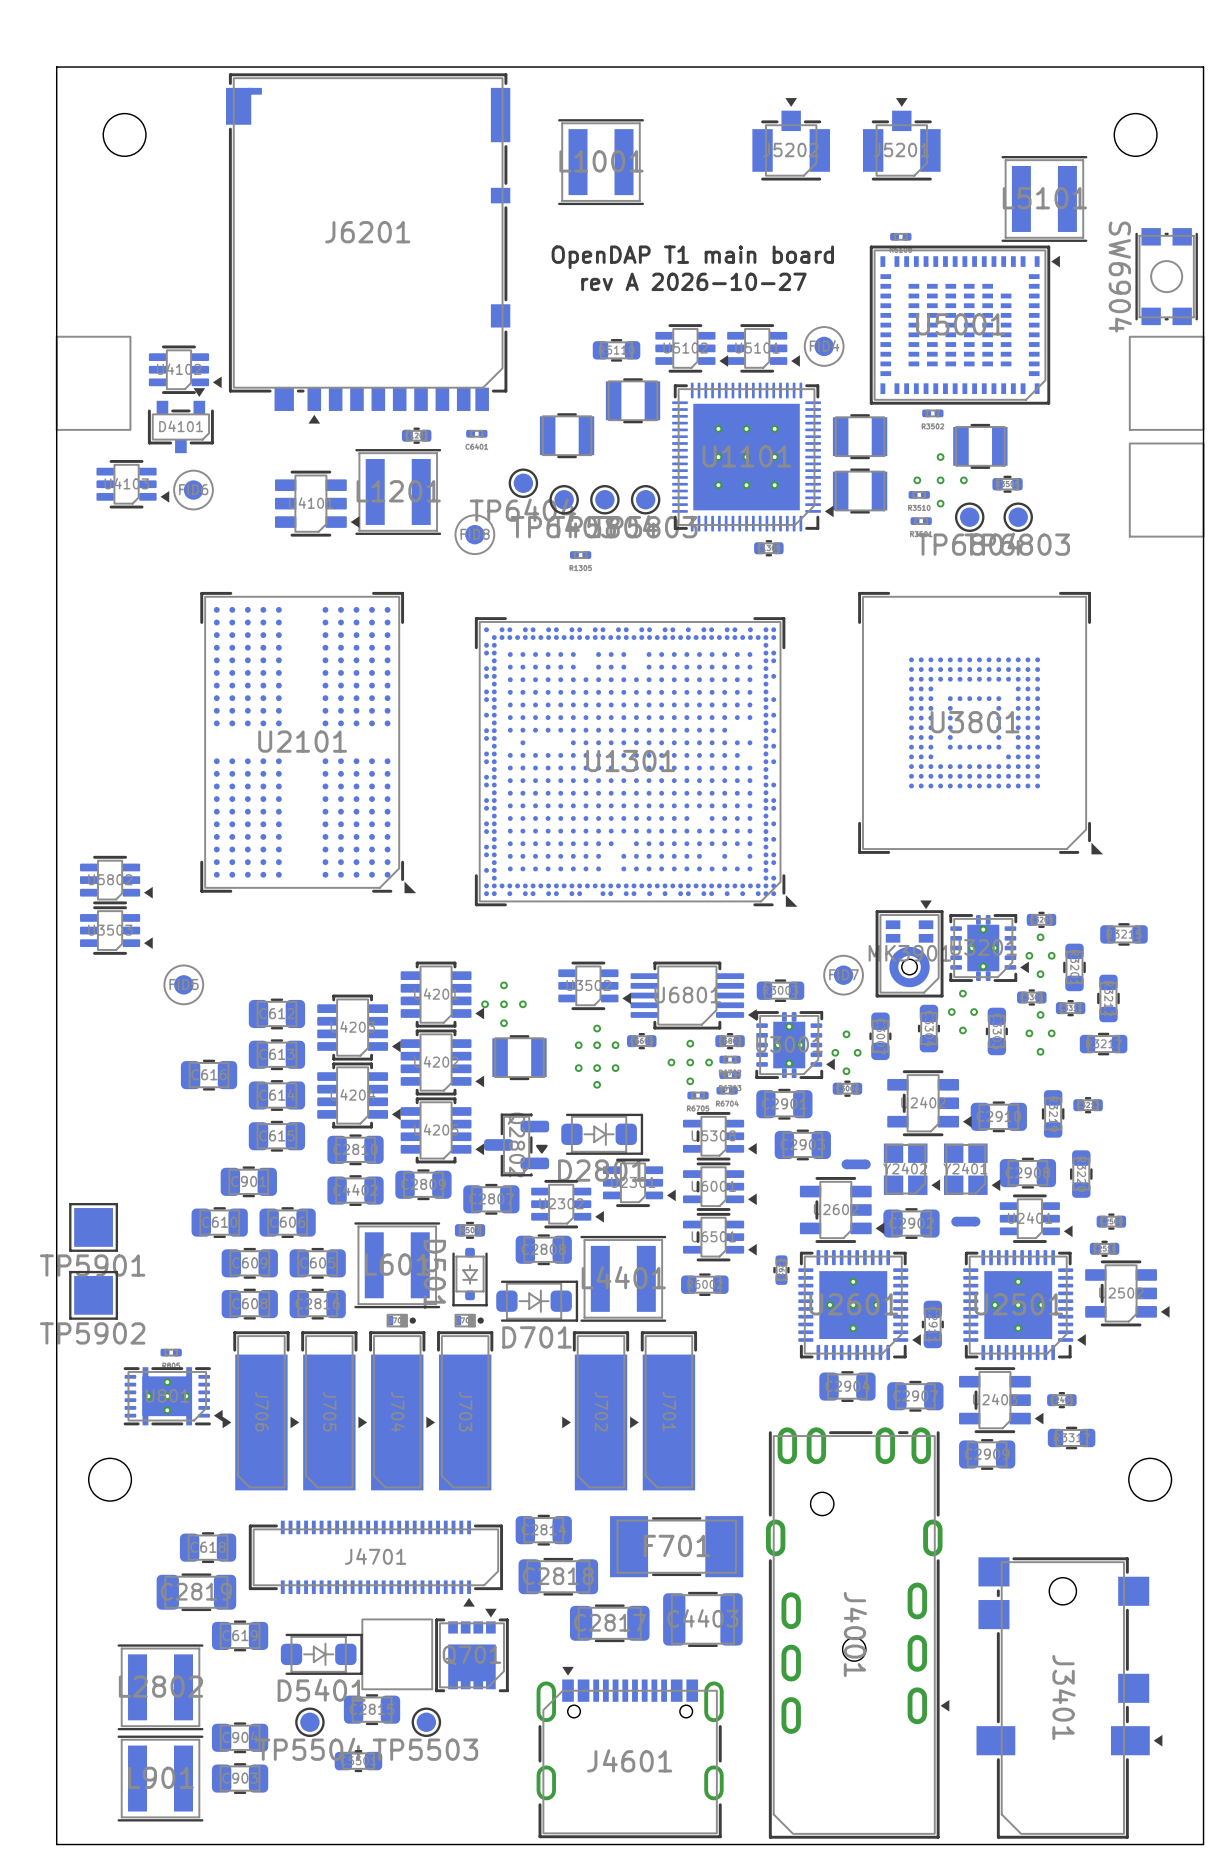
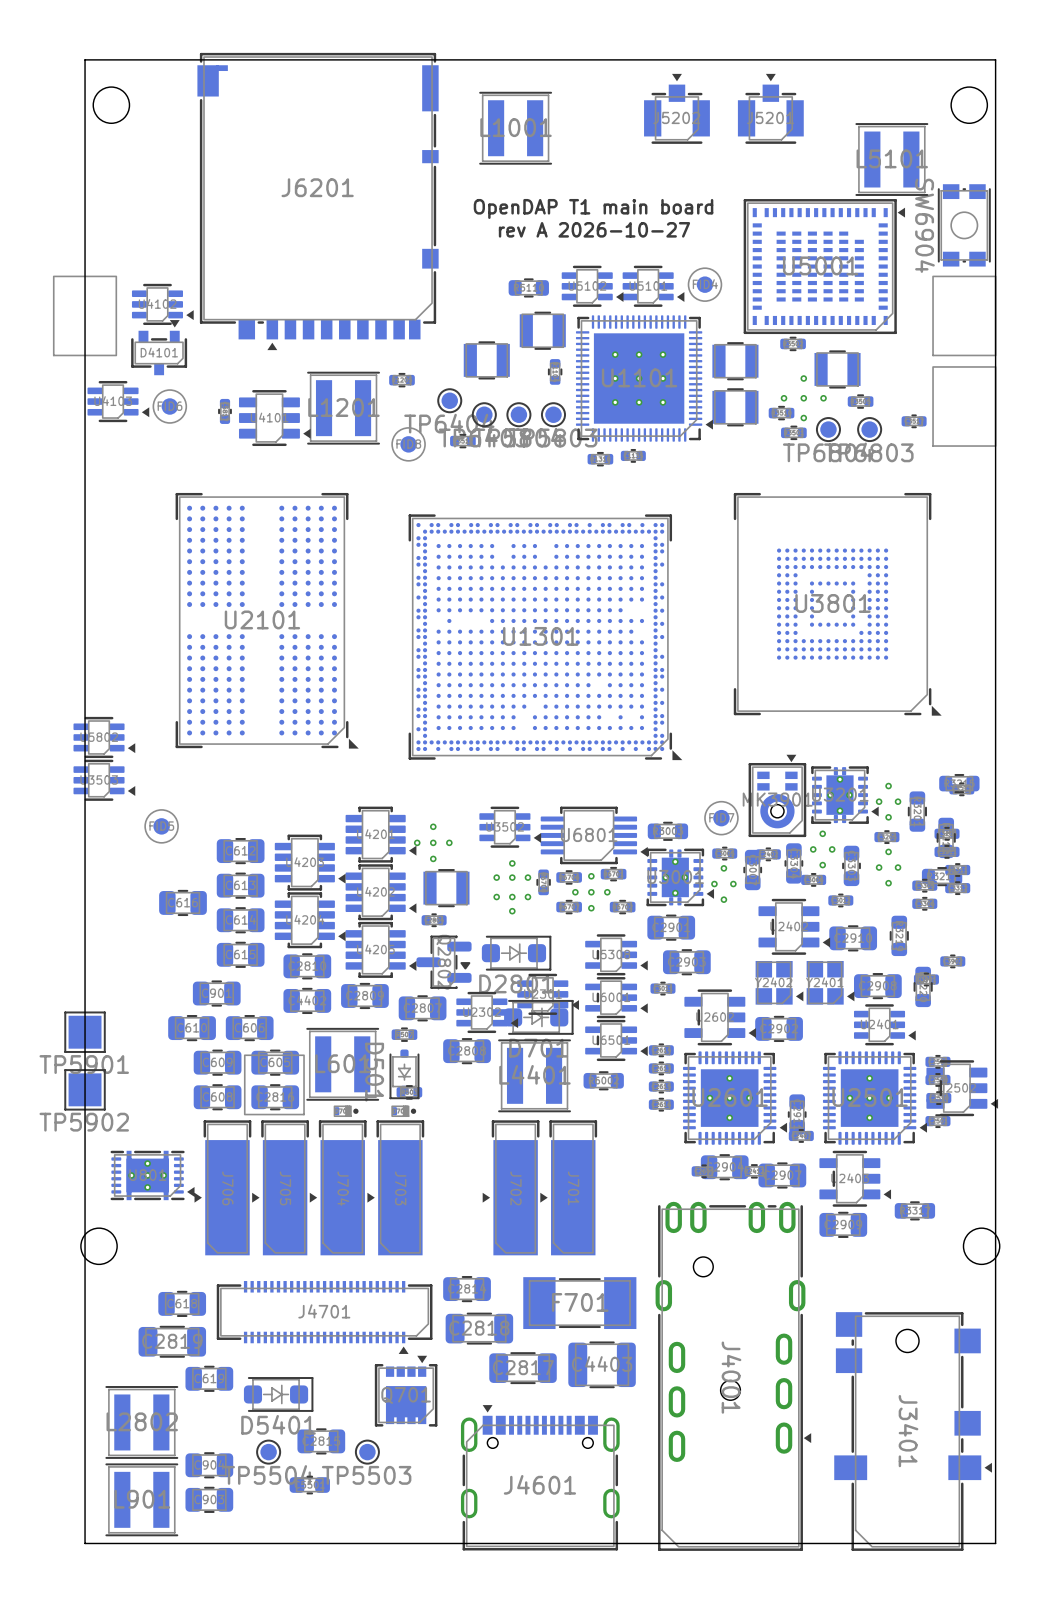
board edge: (1203, 67) (56, 67) (56, 1844) (1203, 1844) (1203, 67) -> (995, 59) (995, 1543) (85, 1543) (85, 59) (995, 59)
part: (900, 236) -> none
SW6904 position: (1166, 276) -> (964, 225)
drawing position: (1166, 383) -> (964, 315)
part footprint: [922, 409, 944, 418] -> [780, 336, 806, 352]
part: (476, 433) -> none
part: (416, 435) -> none
part: none -> (555, 371)
part: none -> (402, 380)
drawing position: (1166, 490) -> (964, 406)
part footprint: [908, 491, 930, 499] -> [768, 405, 795, 421]
part: none -> (224, 411)
part: none -> (914, 421)
part footprint: [910, 517, 932, 525] -> [781, 425, 807, 441]
part: none -> (462, 441)
part: none -> (633, 455)
part: (768, 548) -> none
part: none -> (600, 459)
part: (580, 555) -> none
part position: (1041, 919) -> (886, 837)
part: none -> (947, 833)
part position: (1031, 997) -> (924, 885)
part position: (1070, 1008) -> (957, 870)
part: none -> (947, 851)
part: none -> (724, 853)
part: none -> (768, 854)
part: (641, 1041) -> none
part: none -> (613, 874)
part: (730, 1041) -> none
part: none -> (569, 877)
part: none -> (543, 882)
part footprint: [719, 1055, 741, 1064] -> [609, 899, 636, 915]
part: none -> (957, 888)
part: none -> (840, 900)
part: (730, 1075) -> none
part: none -> (924, 903)
part: none -> (569, 907)
part position: (847, 1088) -> (813, 879)
part: (727, 1090) -> none
part: none -> (434, 920)
part: (698, 1095) -> none
part position: (1088, 1105) -> (961, 789)
part: none -> (952, 961)
part: (856, 1164) -> none
part: none -> (926, 979)
part: none -> (662, 988)
part: (965, 1221) -> none
part position: (1111, 1221) -> (937, 1079)
part: none -> (661, 1050)
part position: (1104, 1248) -> (938, 1098)
part: none -> (937, 1061)
part rotation: 0° (781, 1270) -> 90° clockwise (661, 1068)
part: none -> (661, 1086)
part: none -> (409, 1092)
D701 position: (537, 1301) -> (538, 1017)
part: none -> (661, 1104)
part: none -> (937, 1121)
part: none -> (801, 1135)
part: (171, 1352) -> none
part: none -> (704, 1171)
part: none -> (754, 1171)
part: (1061, 1400) -> none
drawing position: (397, 1654) -> (274, 1084)

